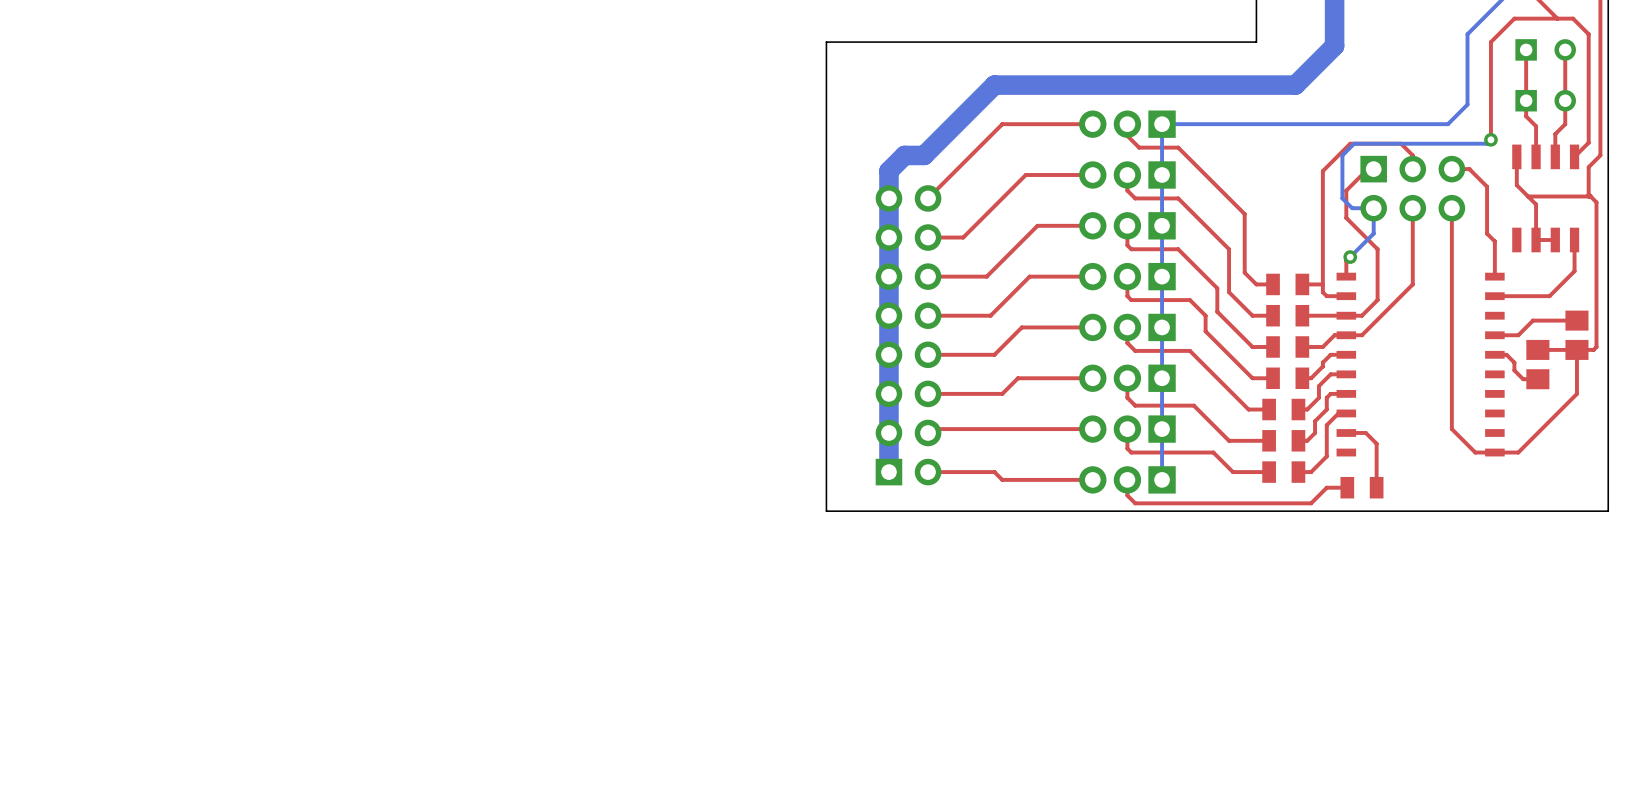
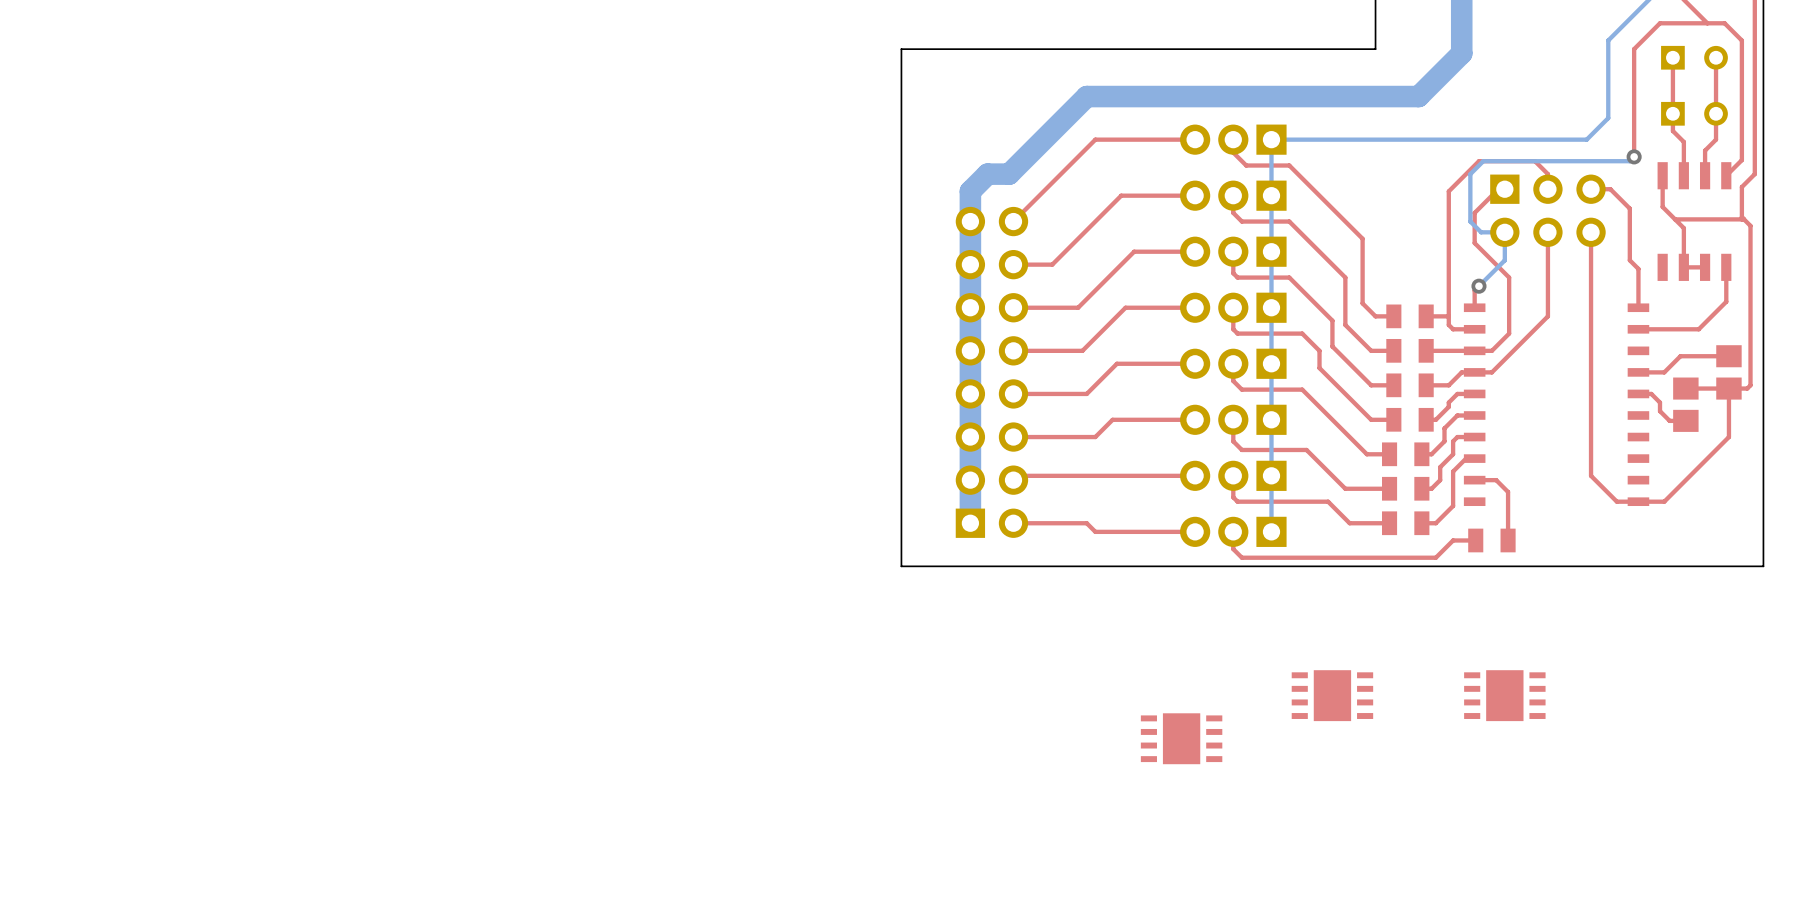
part: none -> (1332, 695)
part: none -> (1504, 695)
part: none -> (1181, 738)

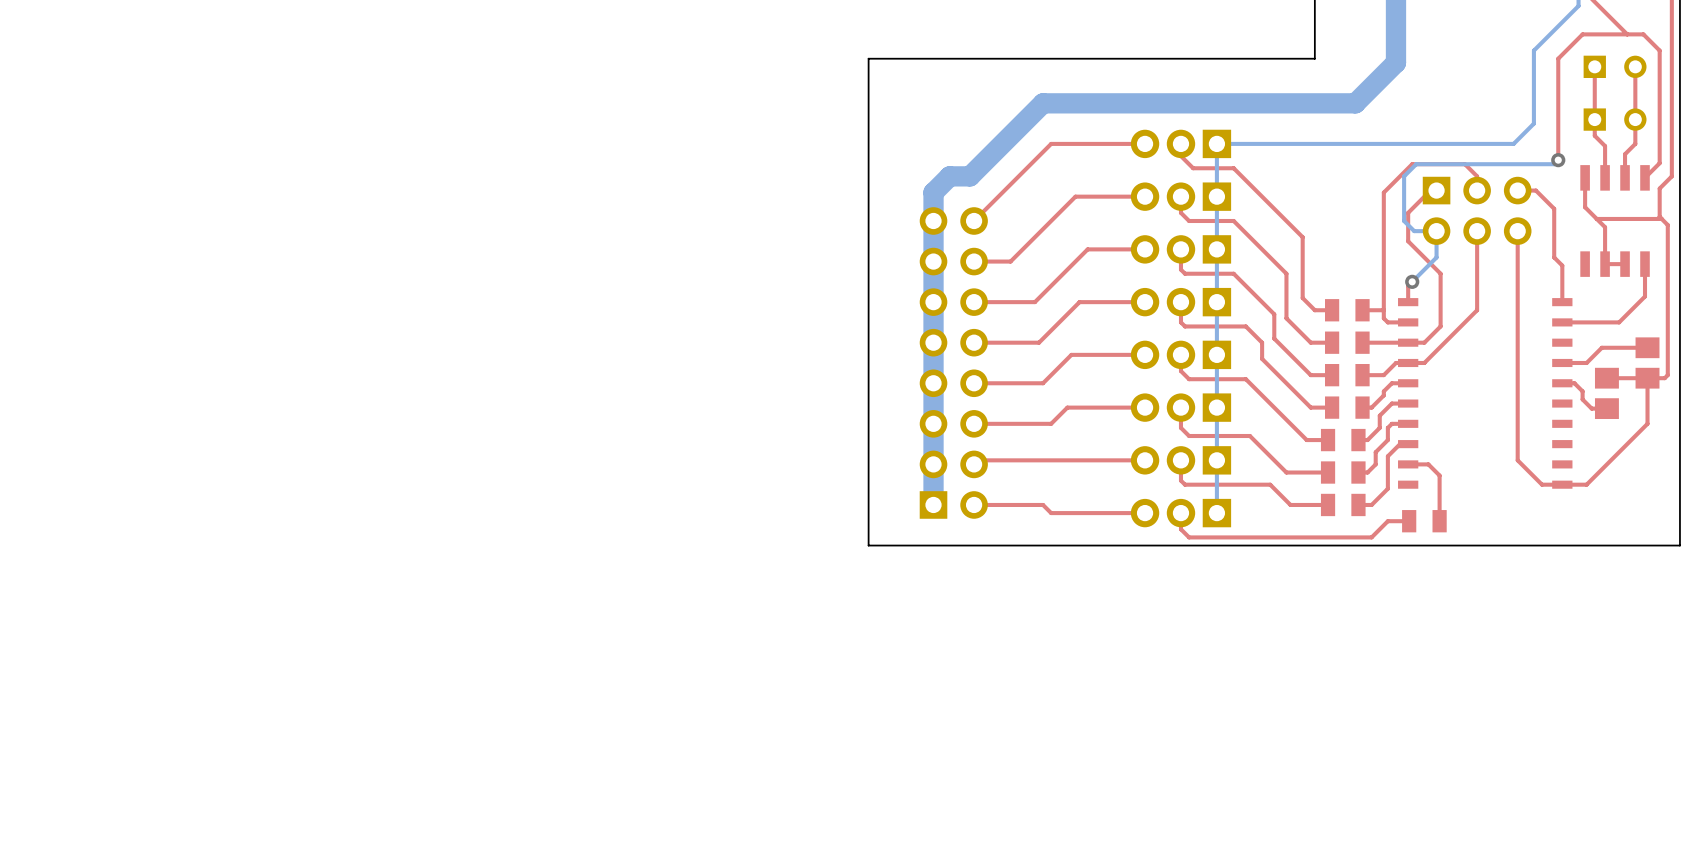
part: (1332, 695) -> none
part: (1504, 695) -> none
part: (1181, 738) -> none

